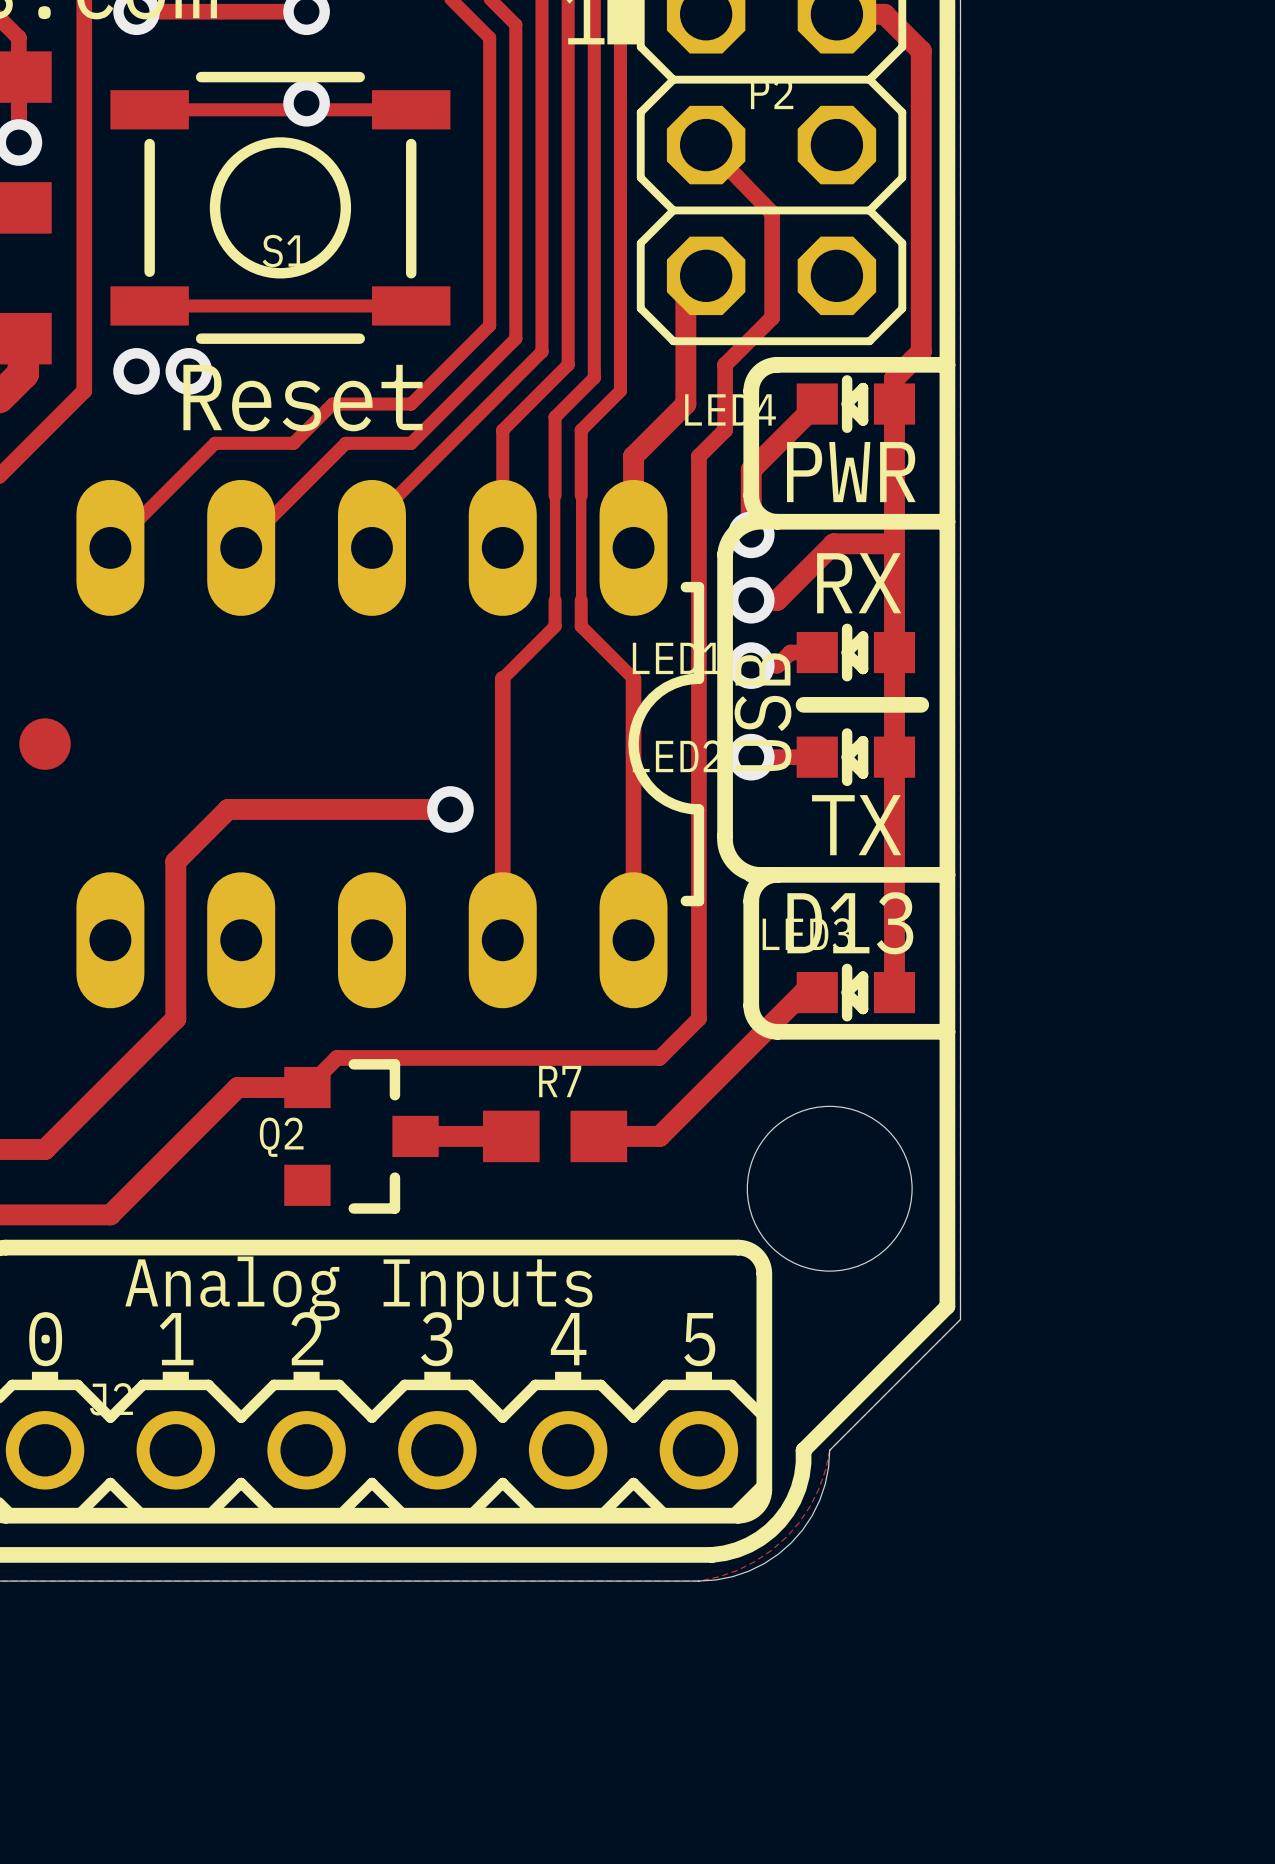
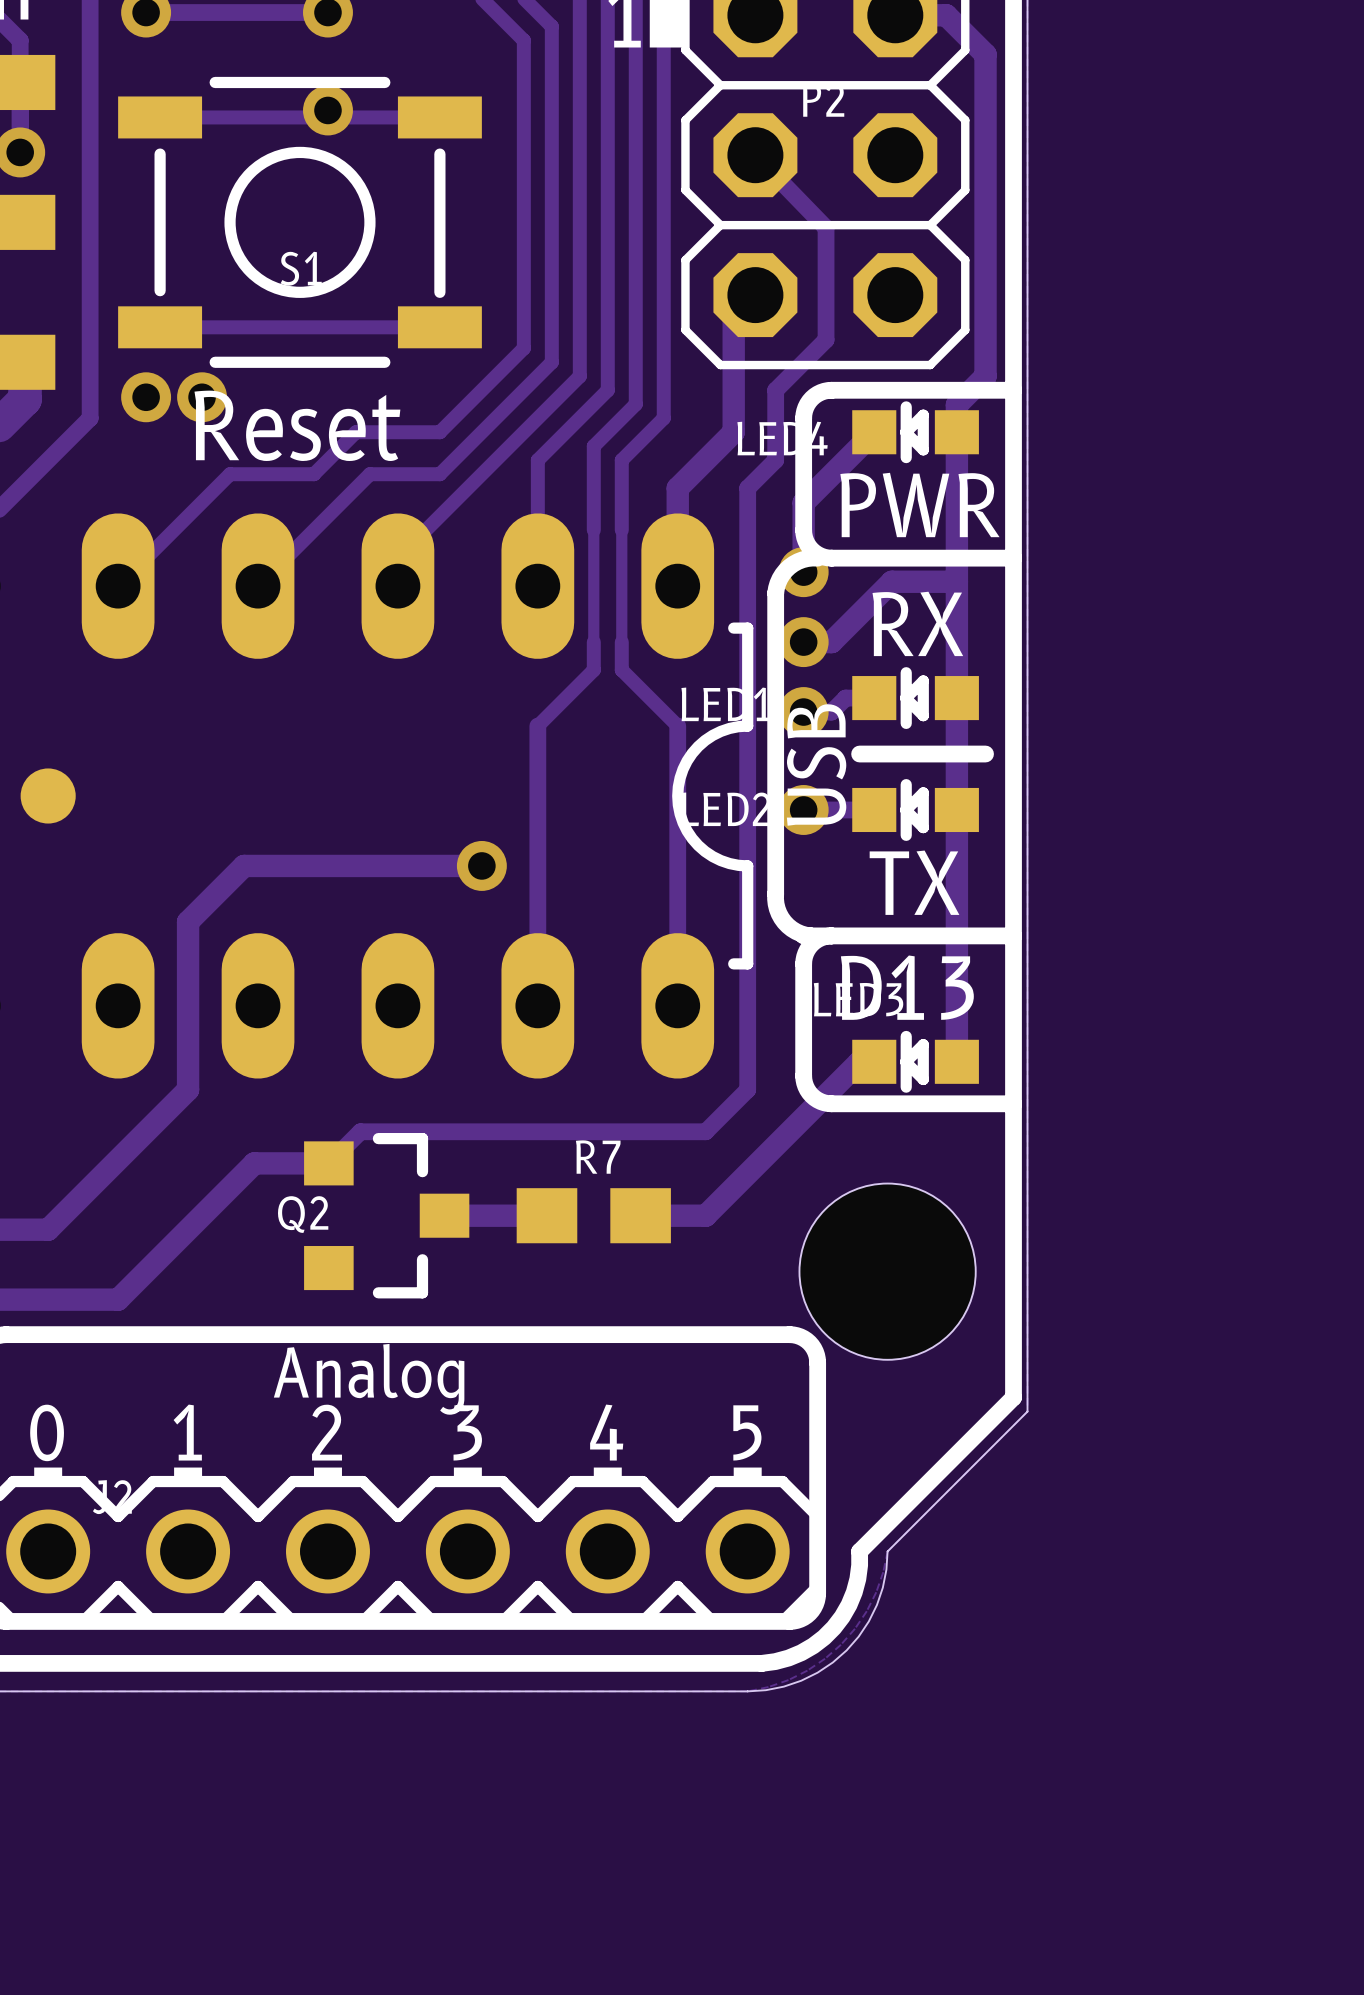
text: Analog Inputs (358, 1288) -> Analog (369, 1379)

